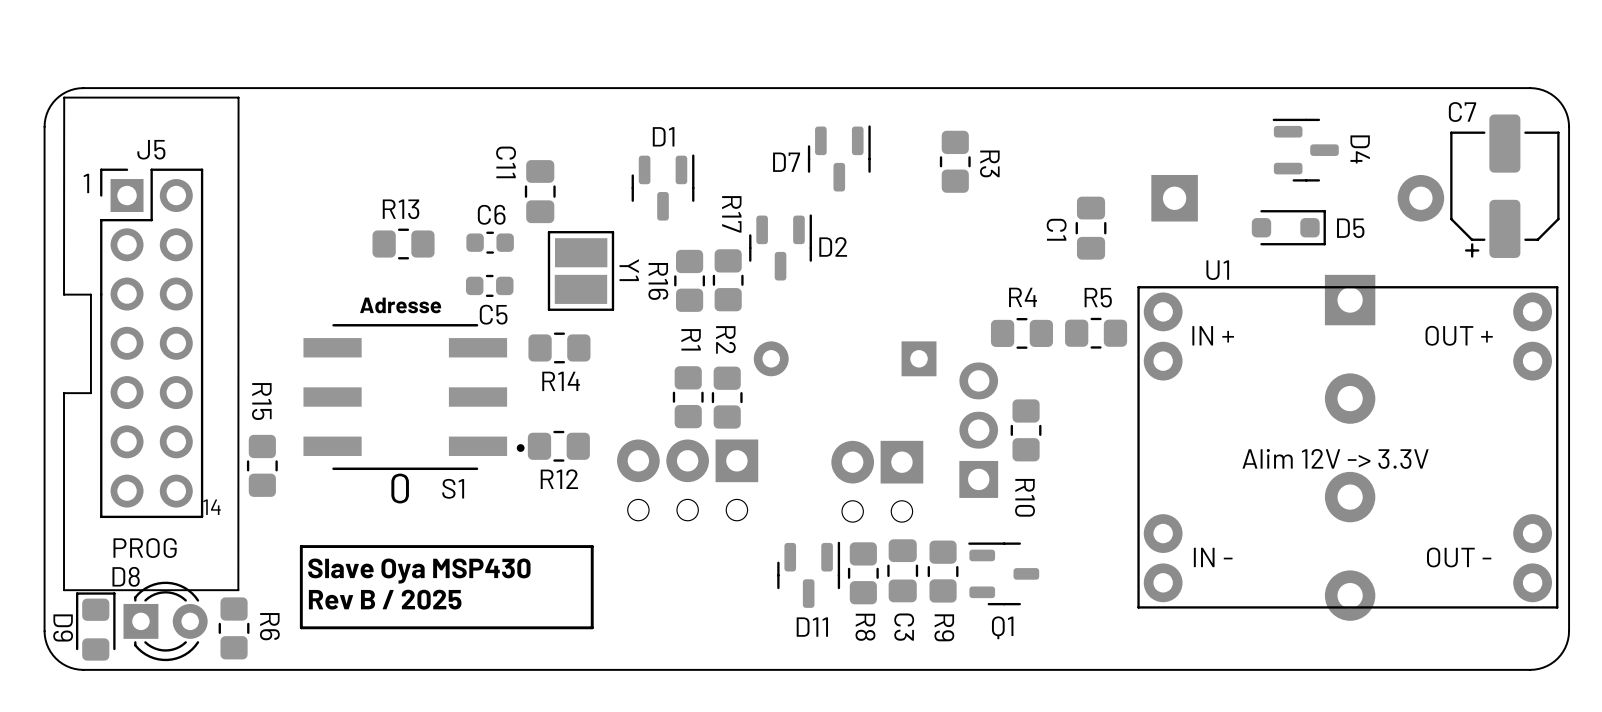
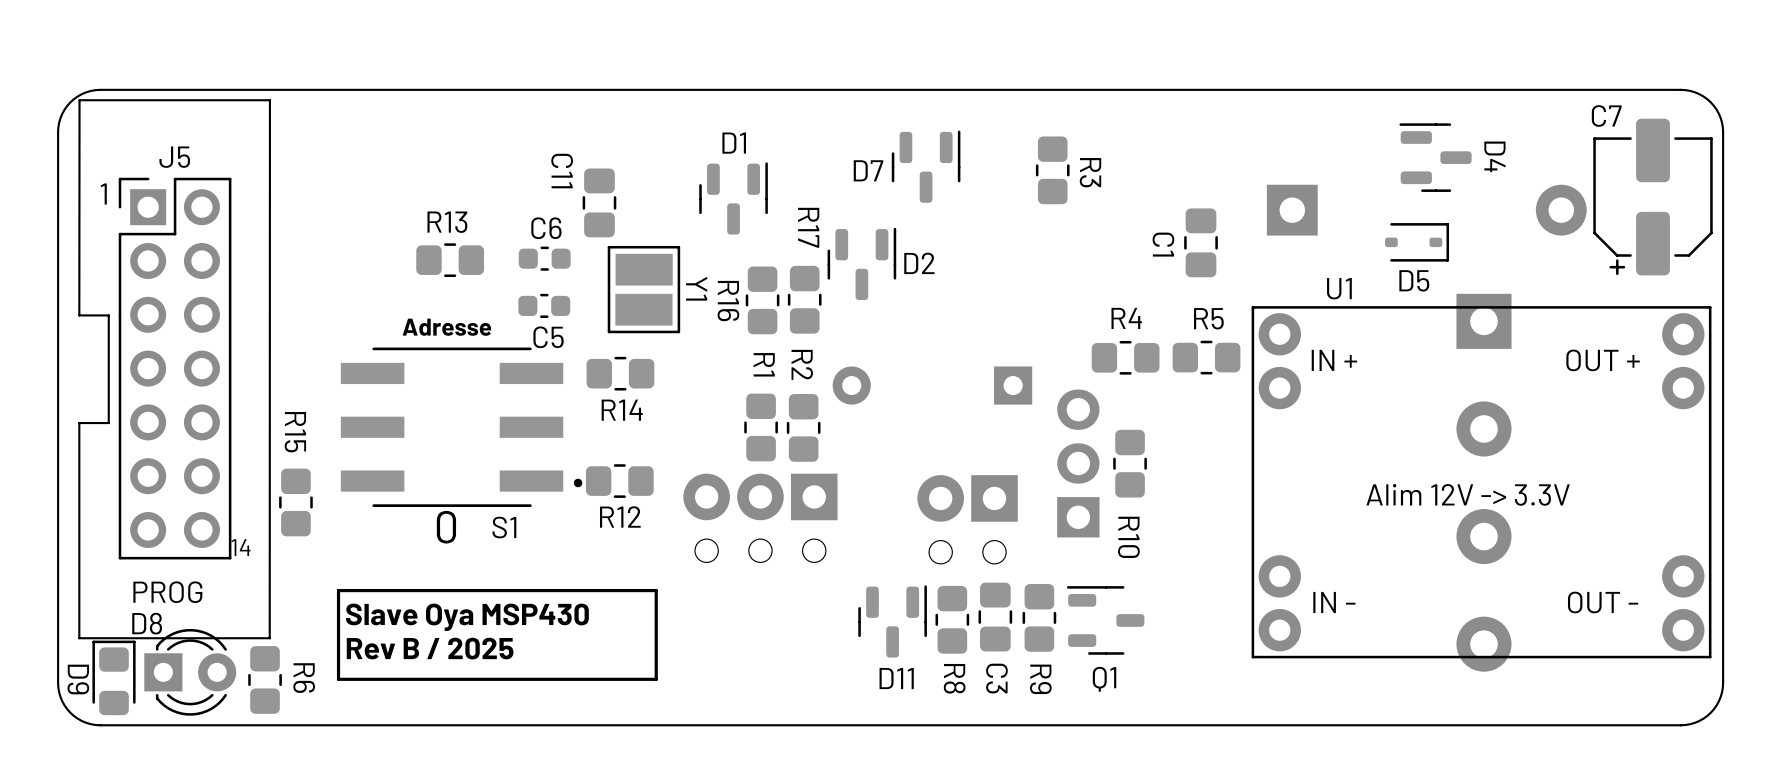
D5 footprint: [1251, 210, 1326, 246] -> [1385, 223, 1450, 262]
D5 name position: D5 (1350, 228) -> D5 (1414, 280)

